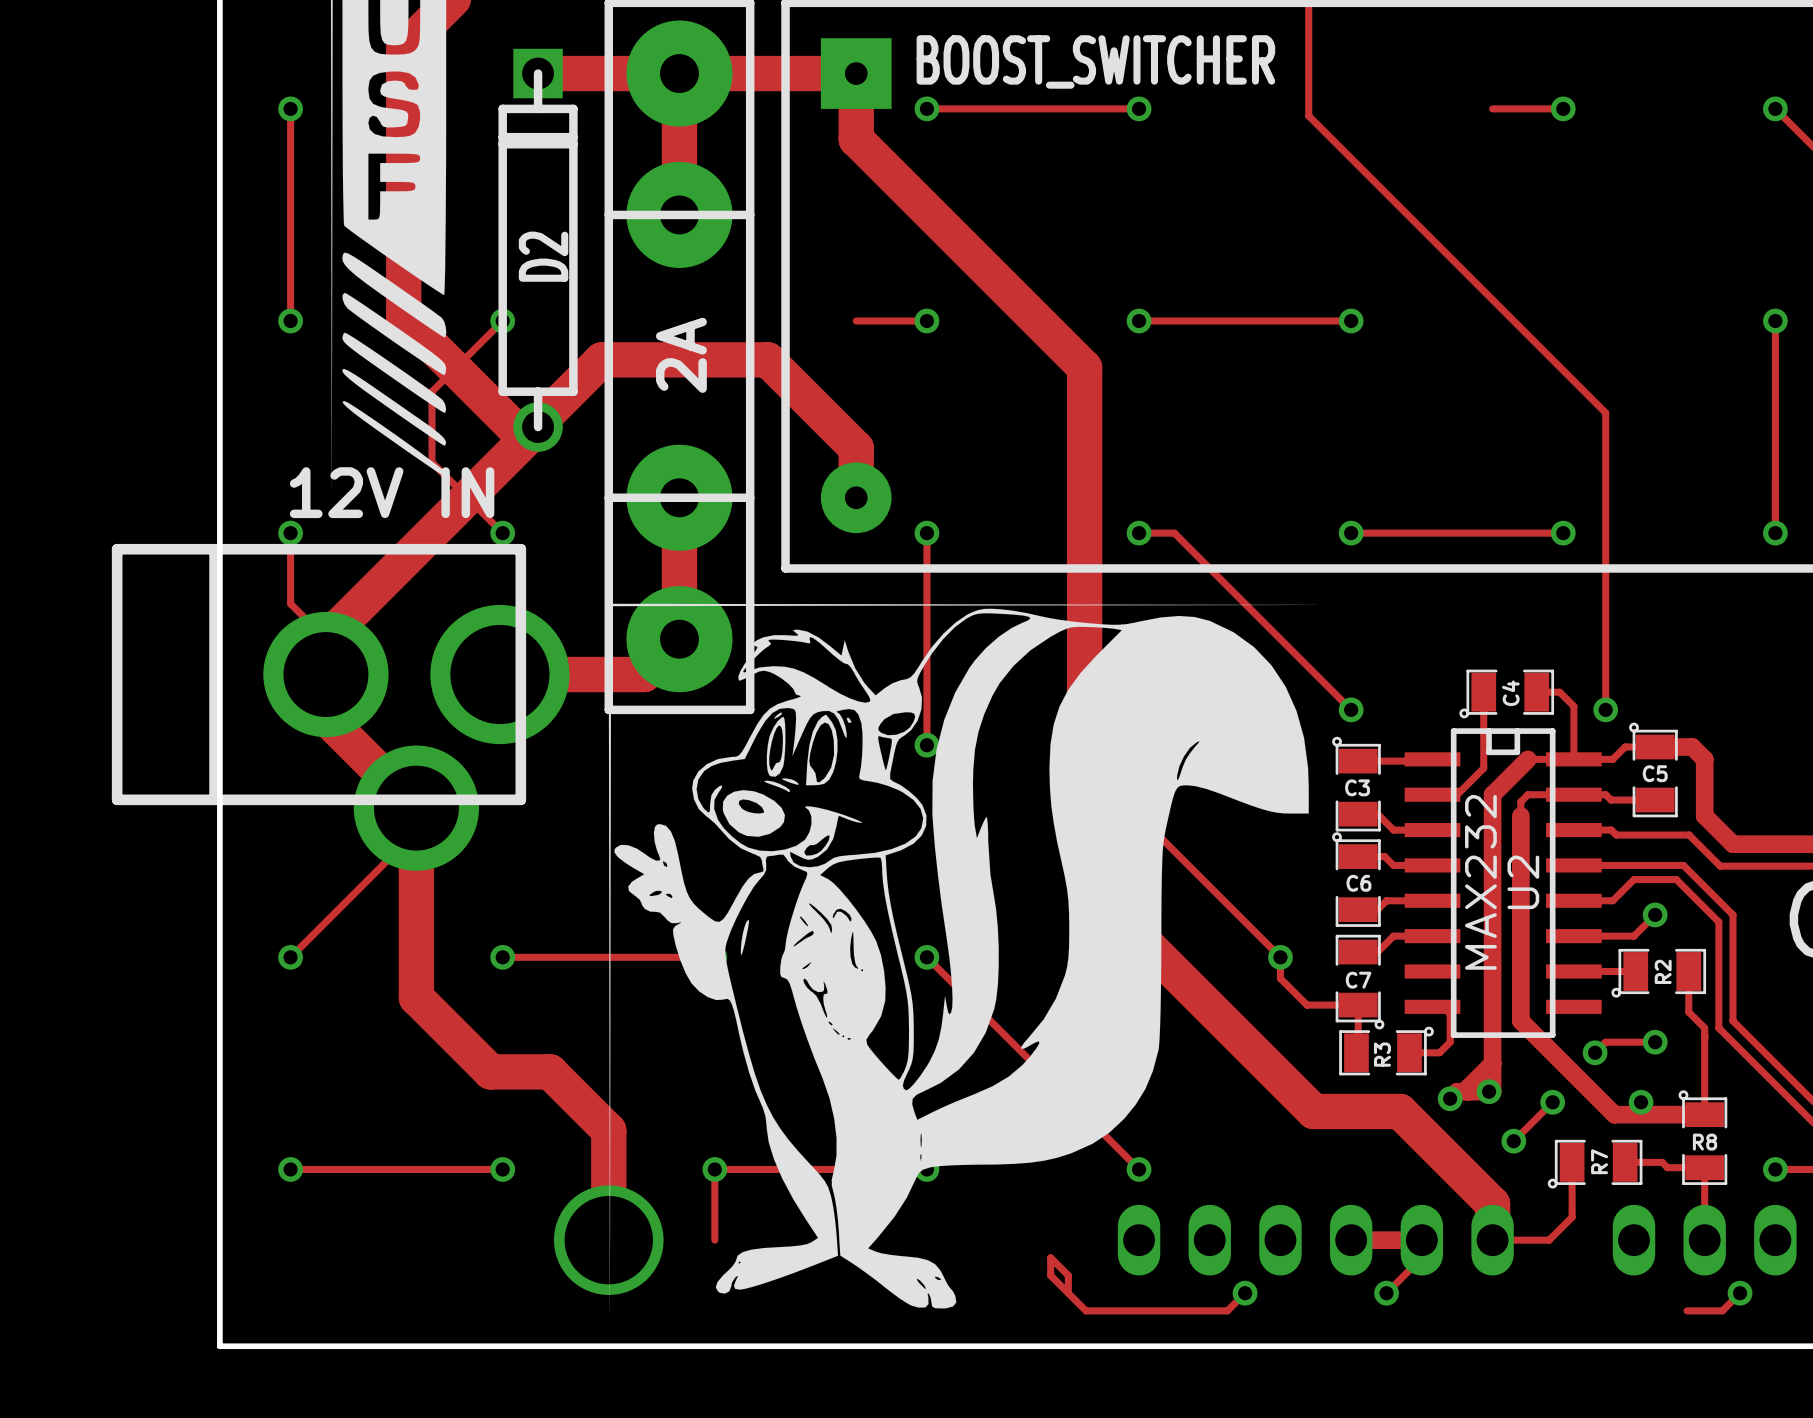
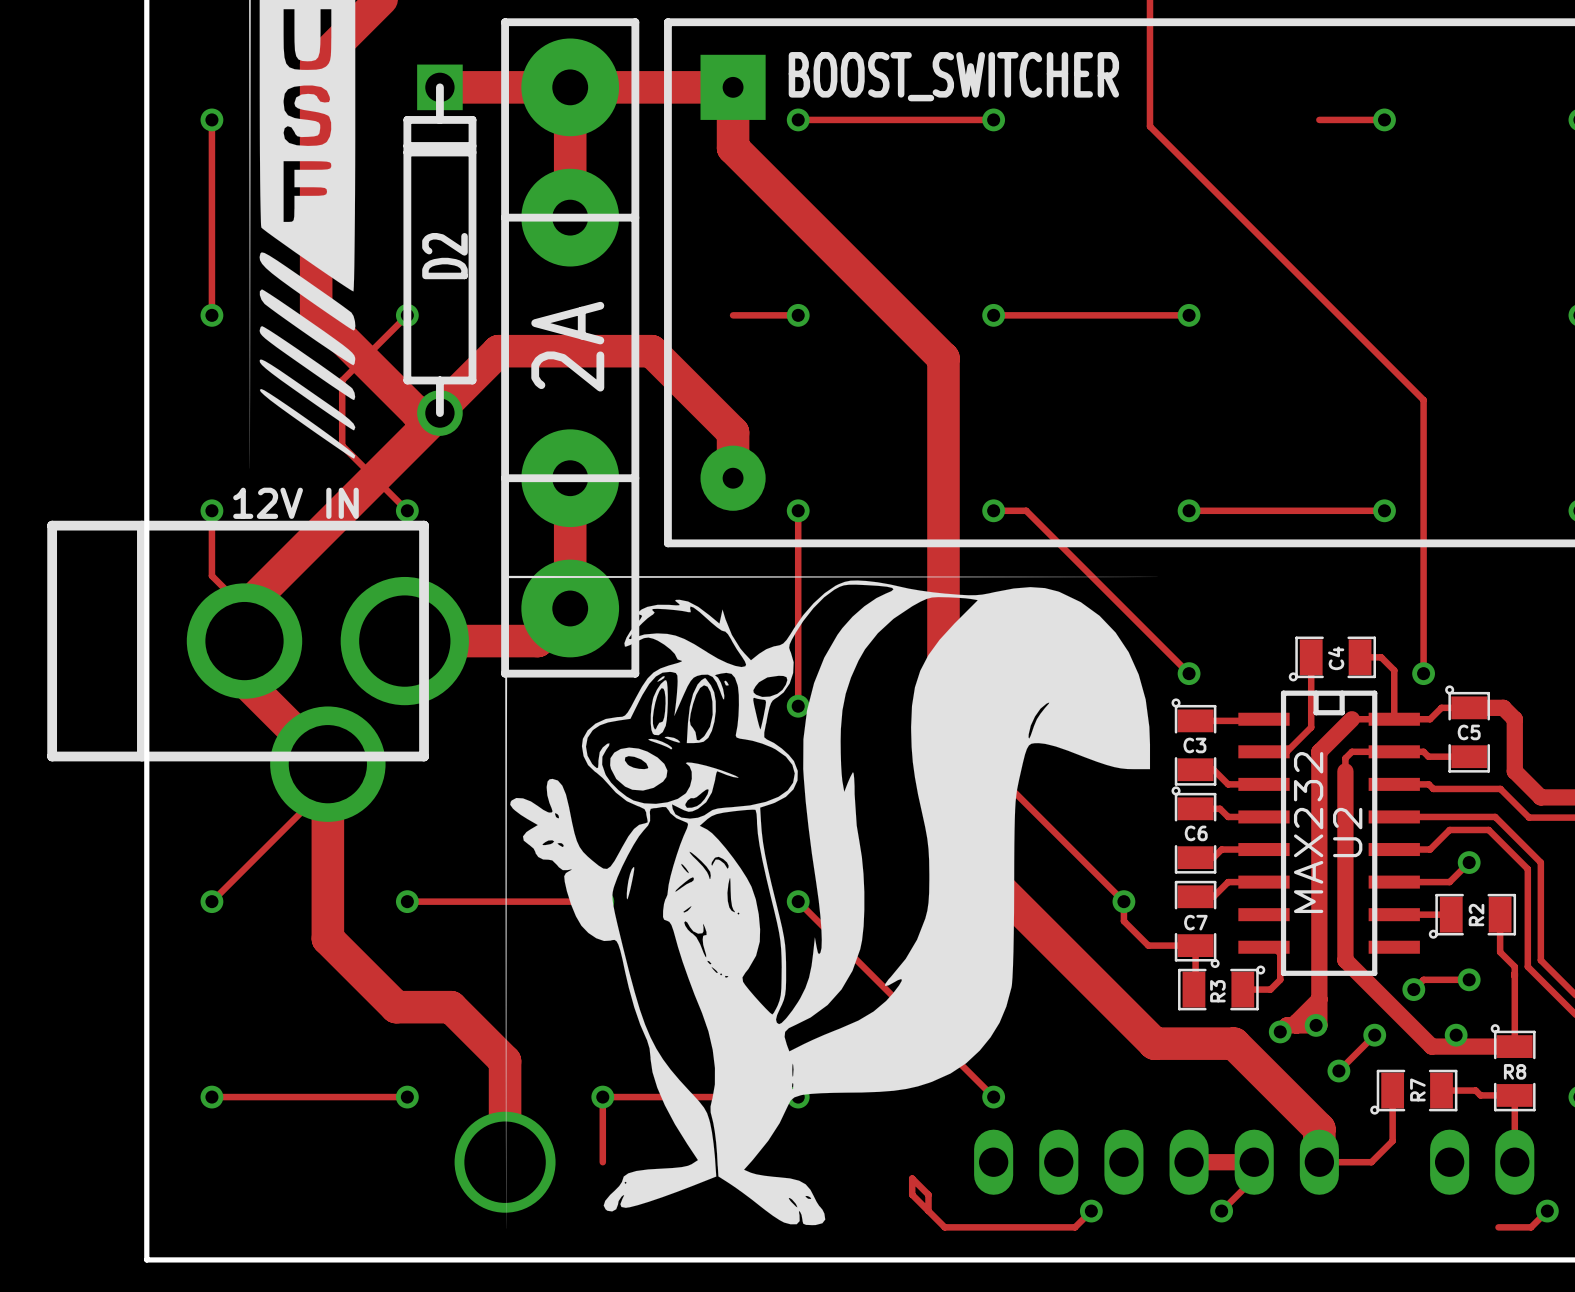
part value: none -> 2A (567, 346)
text: 2A (681, 355) -> none
text: 12V IN (392, 492) -> none
part value: none -> 12V IN (295, 503)

